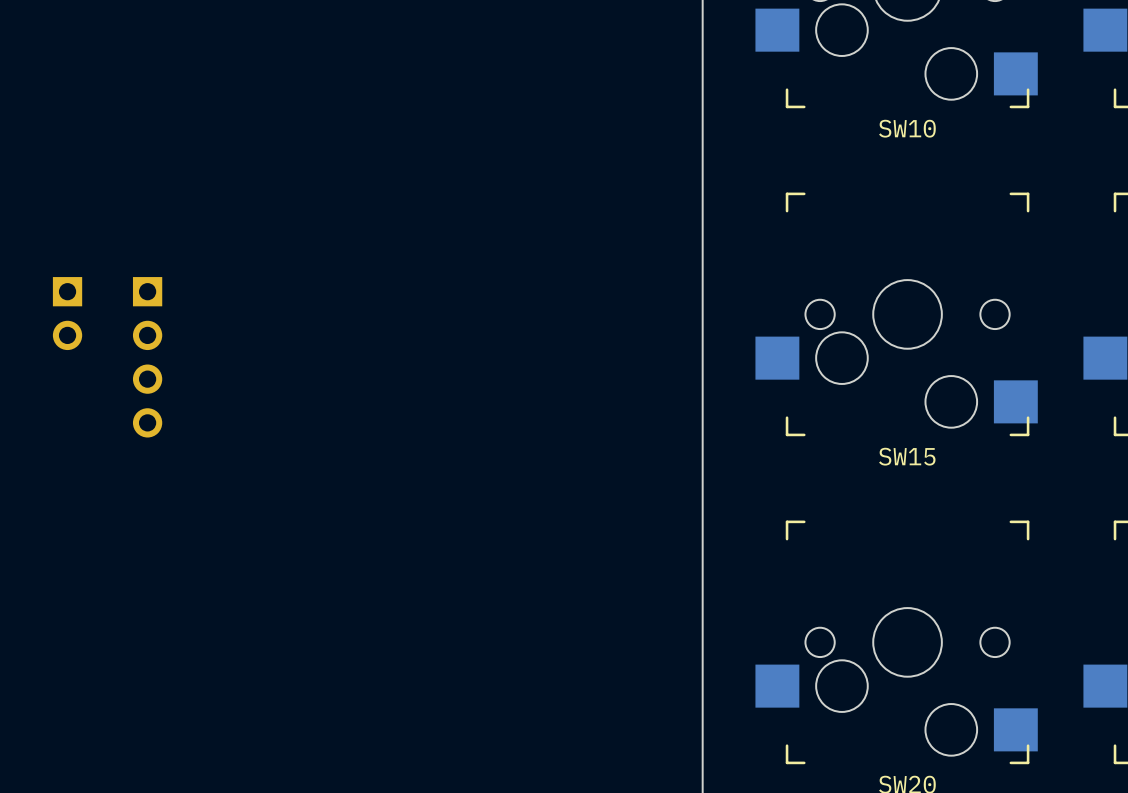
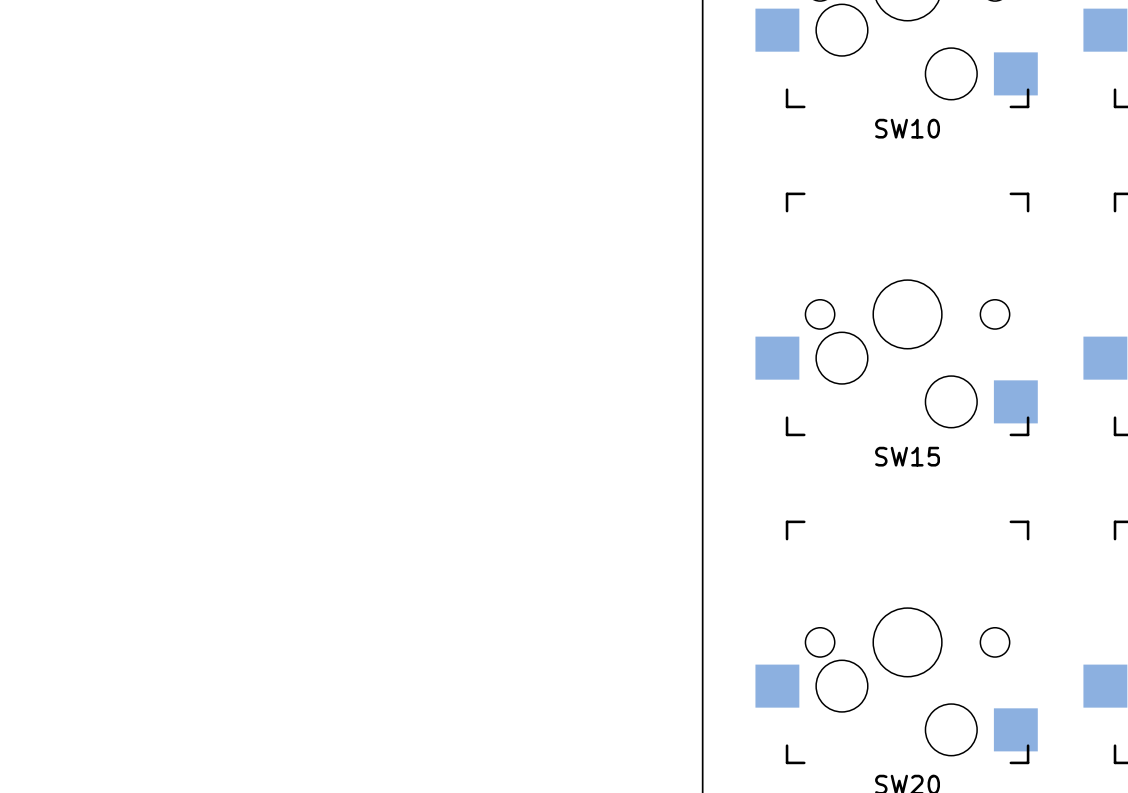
part: (67, 313) -> none
part: (147, 357) -> none

